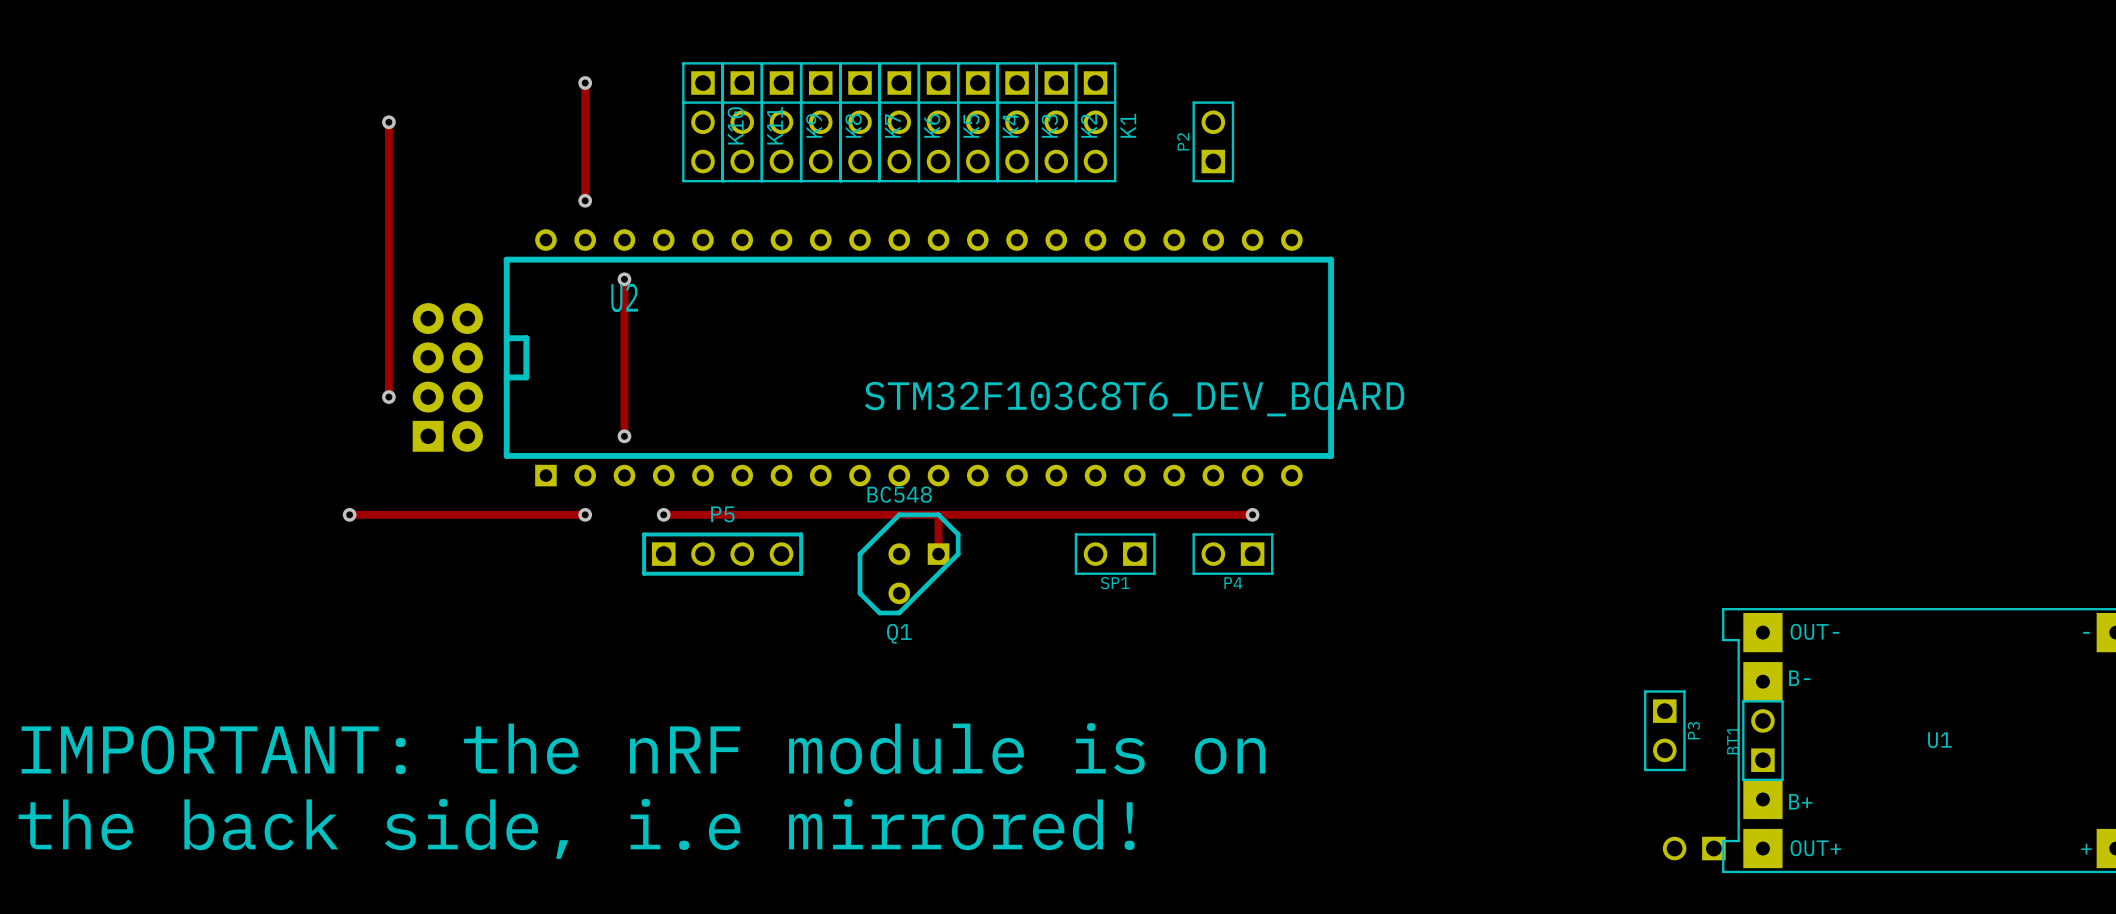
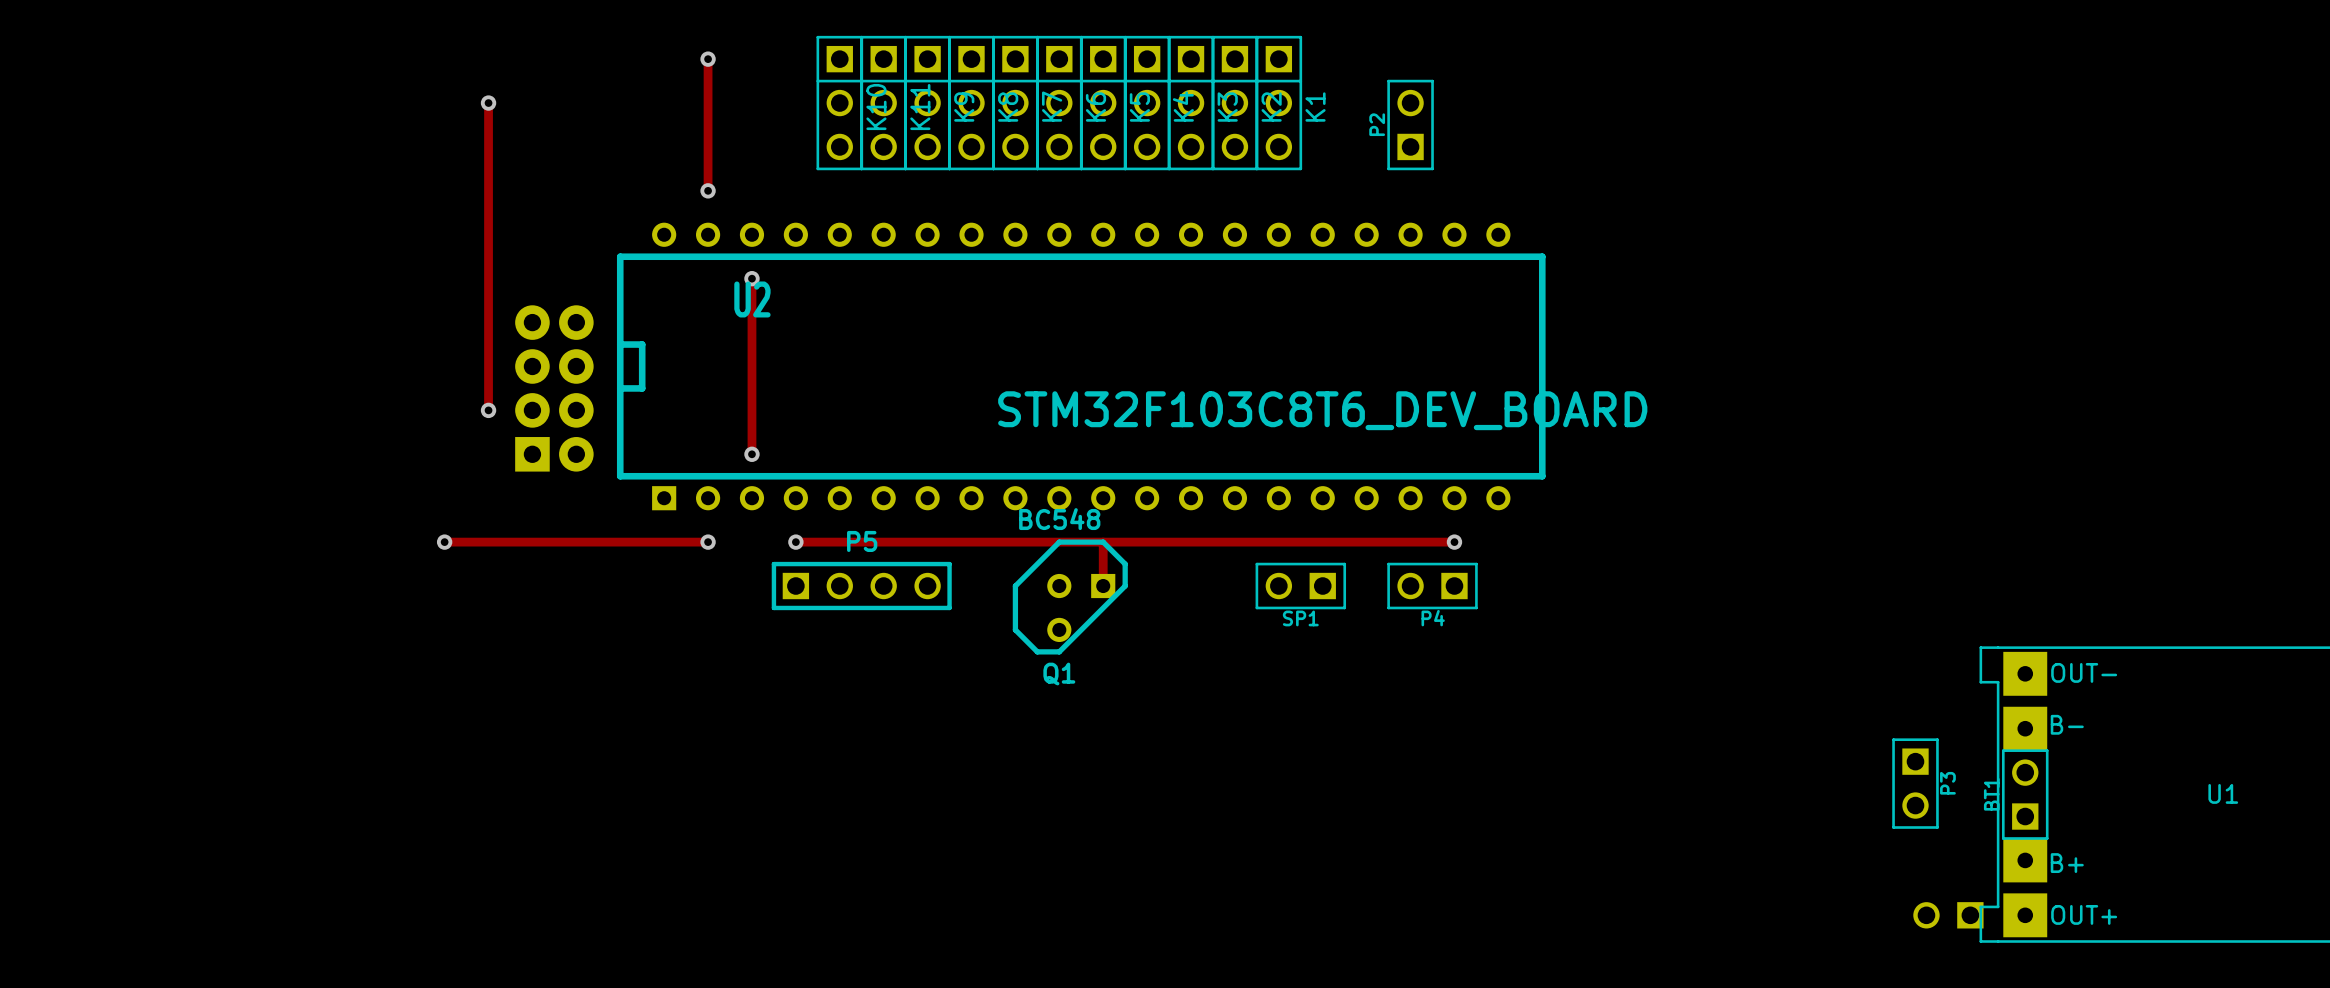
text: IMPORTANT: the nRF module is on (643, 748) -> none
text: the back side, i.e mirrored! (576, 828) -> none

